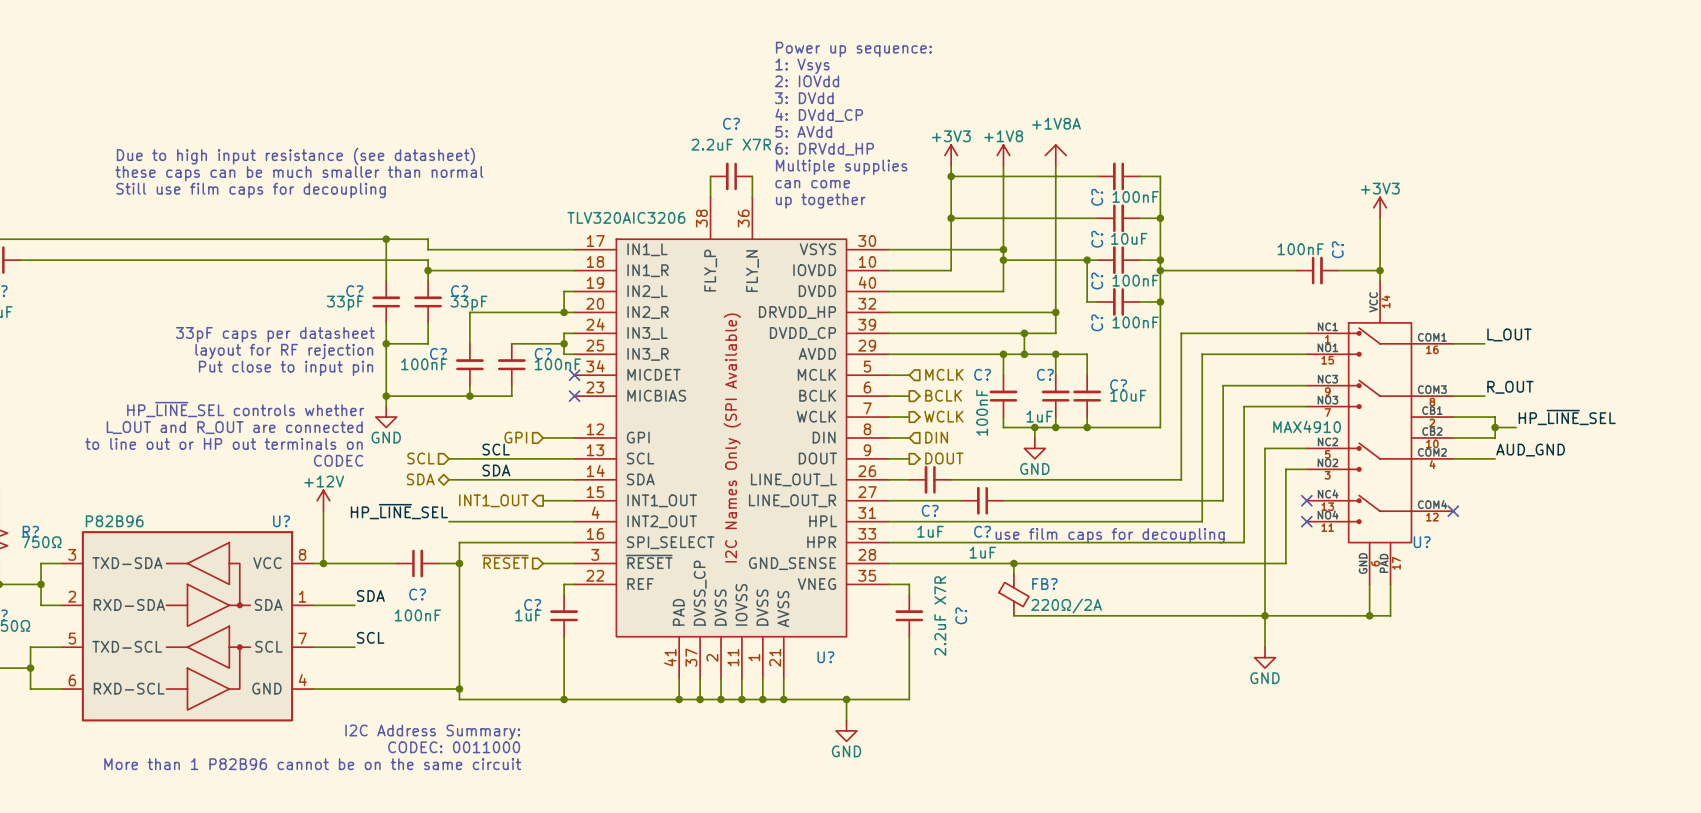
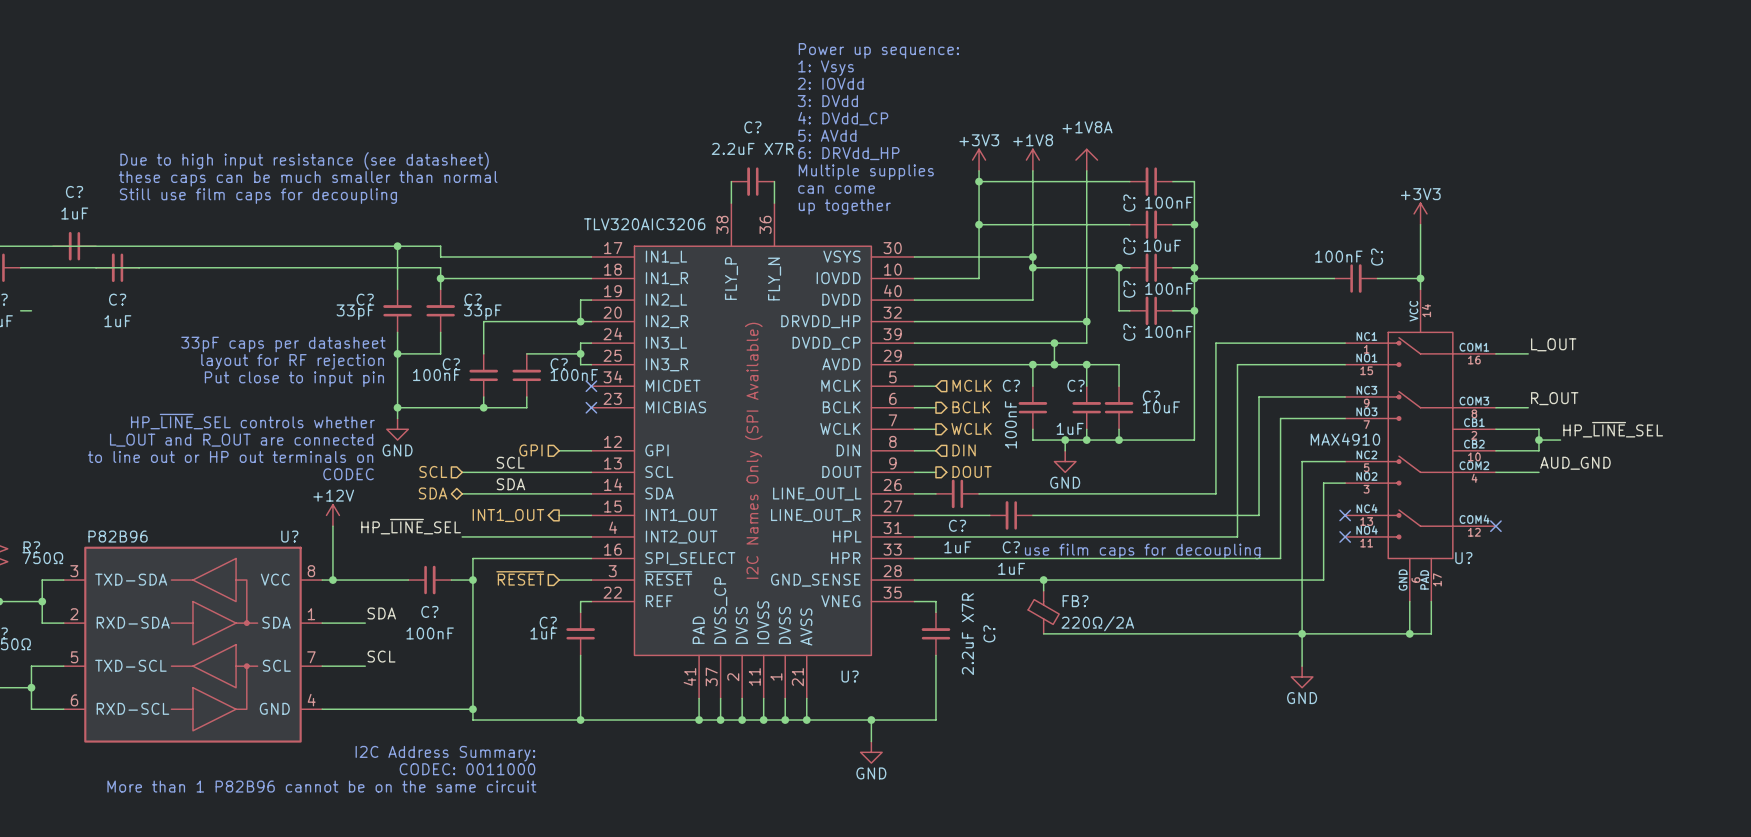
C?: none -> 1uF (74, 246)
C?: none -> 1uF (117, 267)
wire: none -> (20, 310) (31, 310)

